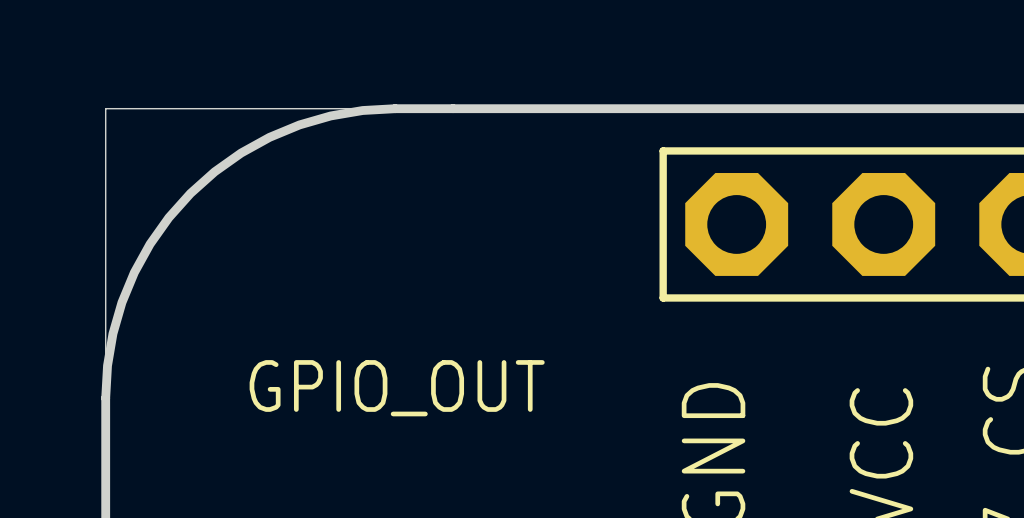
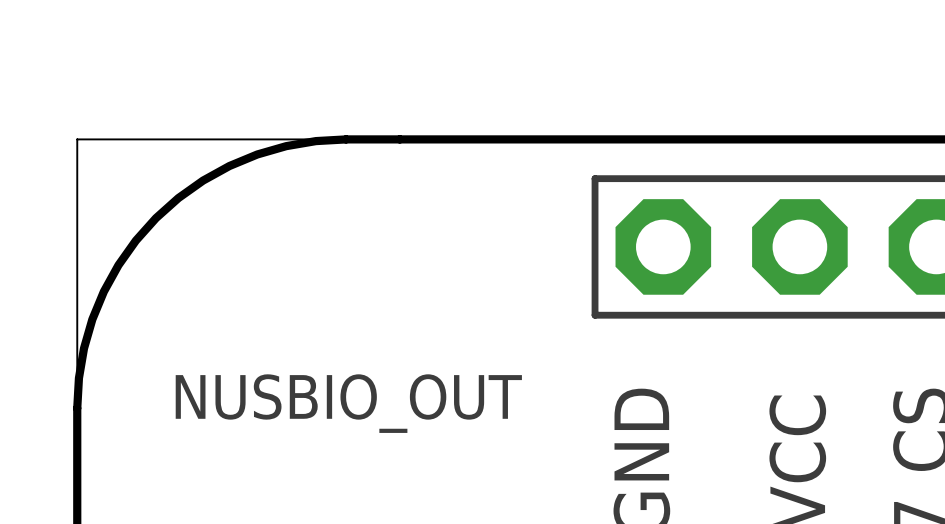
GPIO_OUT name: GPIO_OUT (397, 388) -> NUSBIO_OUT (348, 403)

